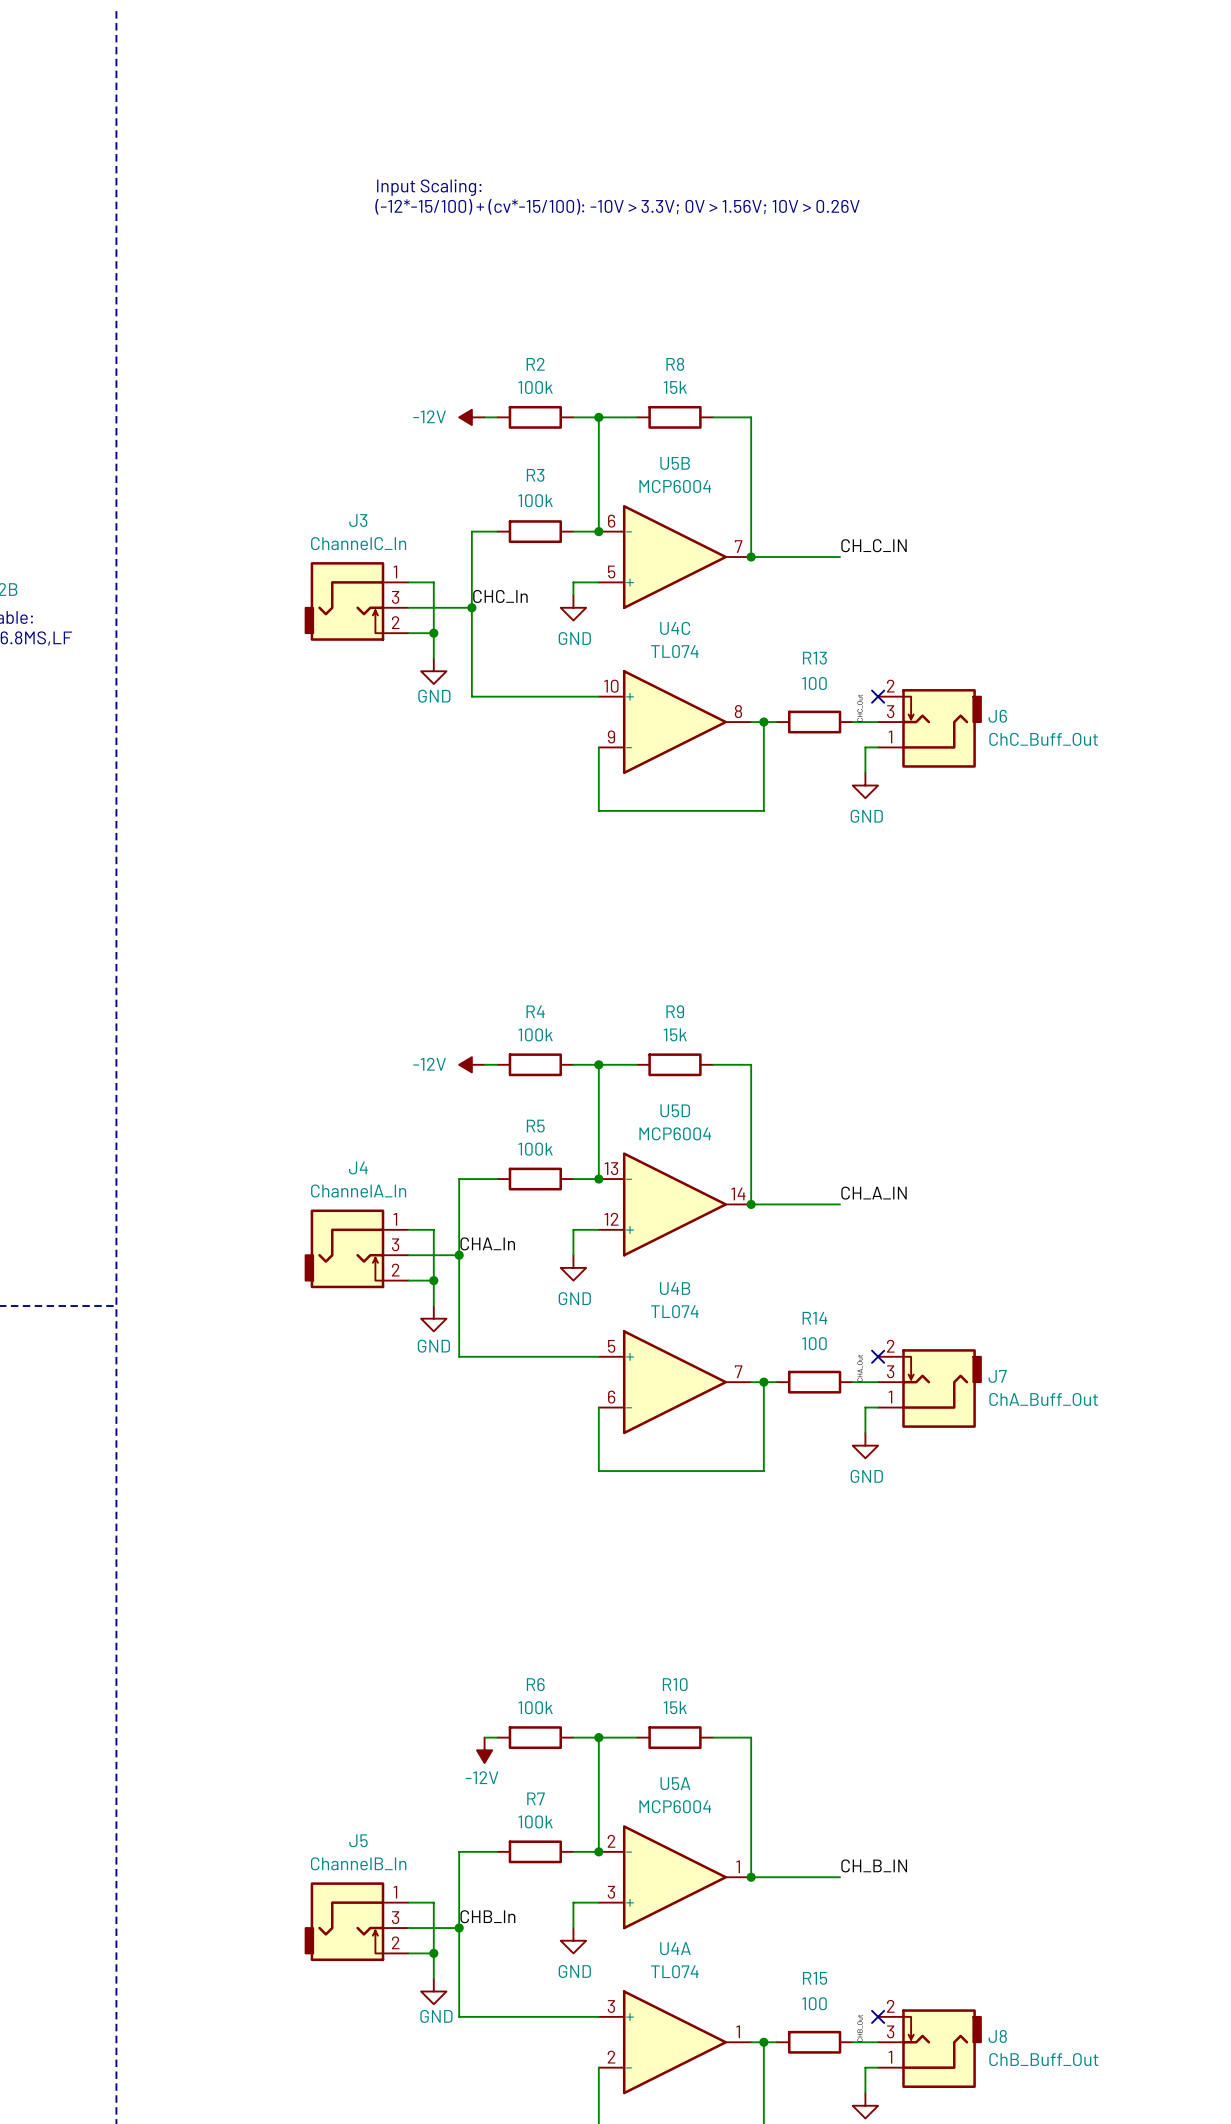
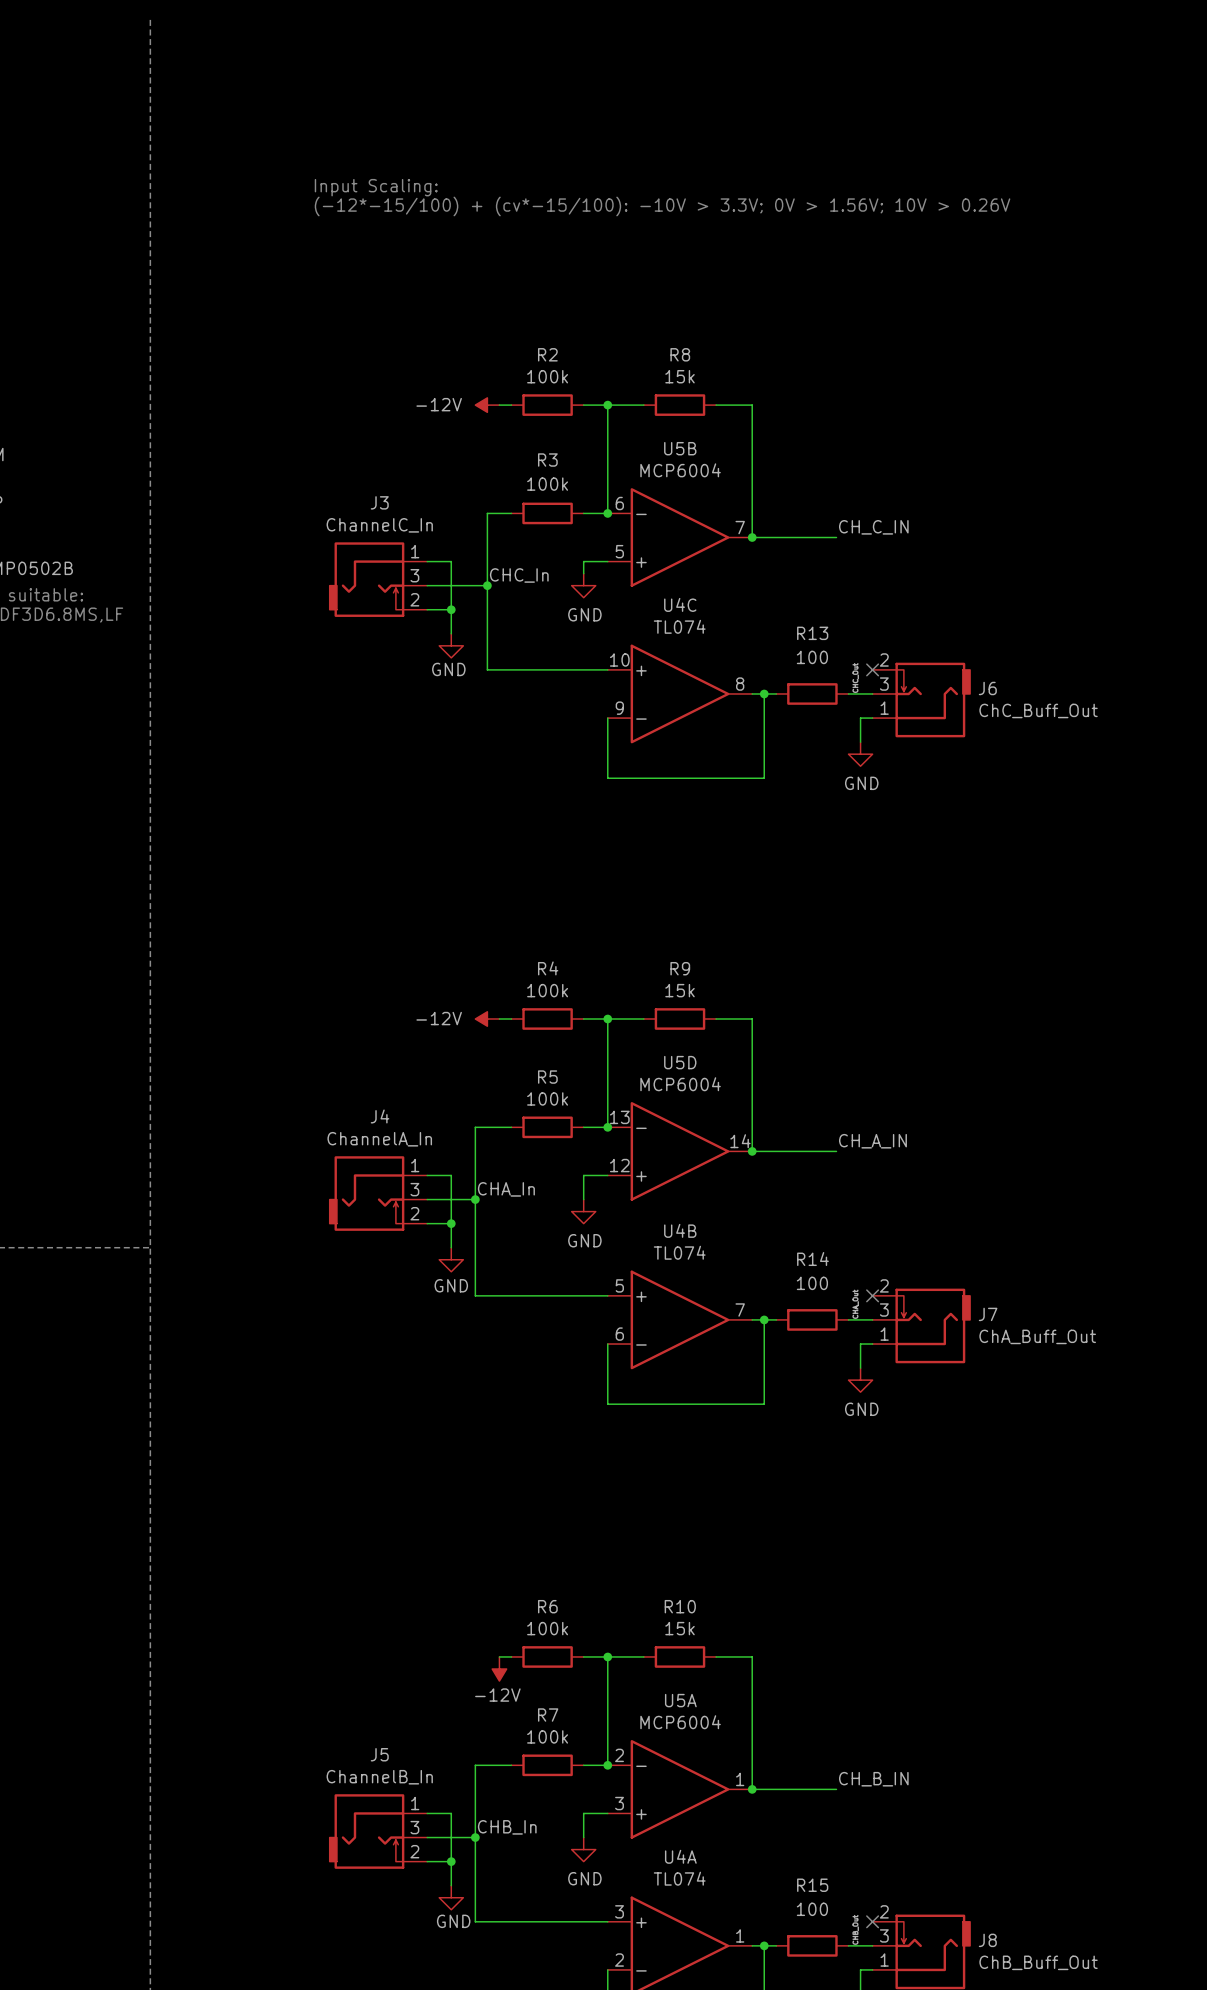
text position: Input Scaling: (429, 187) -> Input Scaling: (376, 187)
text position: (-12*-15/100) + (cv*-15/100): -10V > 3.3V; 0V > 1.56V; 10V > 0.26V (617, 206) -> (-12*-15/100) + (cv*-15/100): -10V > 3.3V; 0V > 1.56V; 10V > 0.26V (662, 206)

